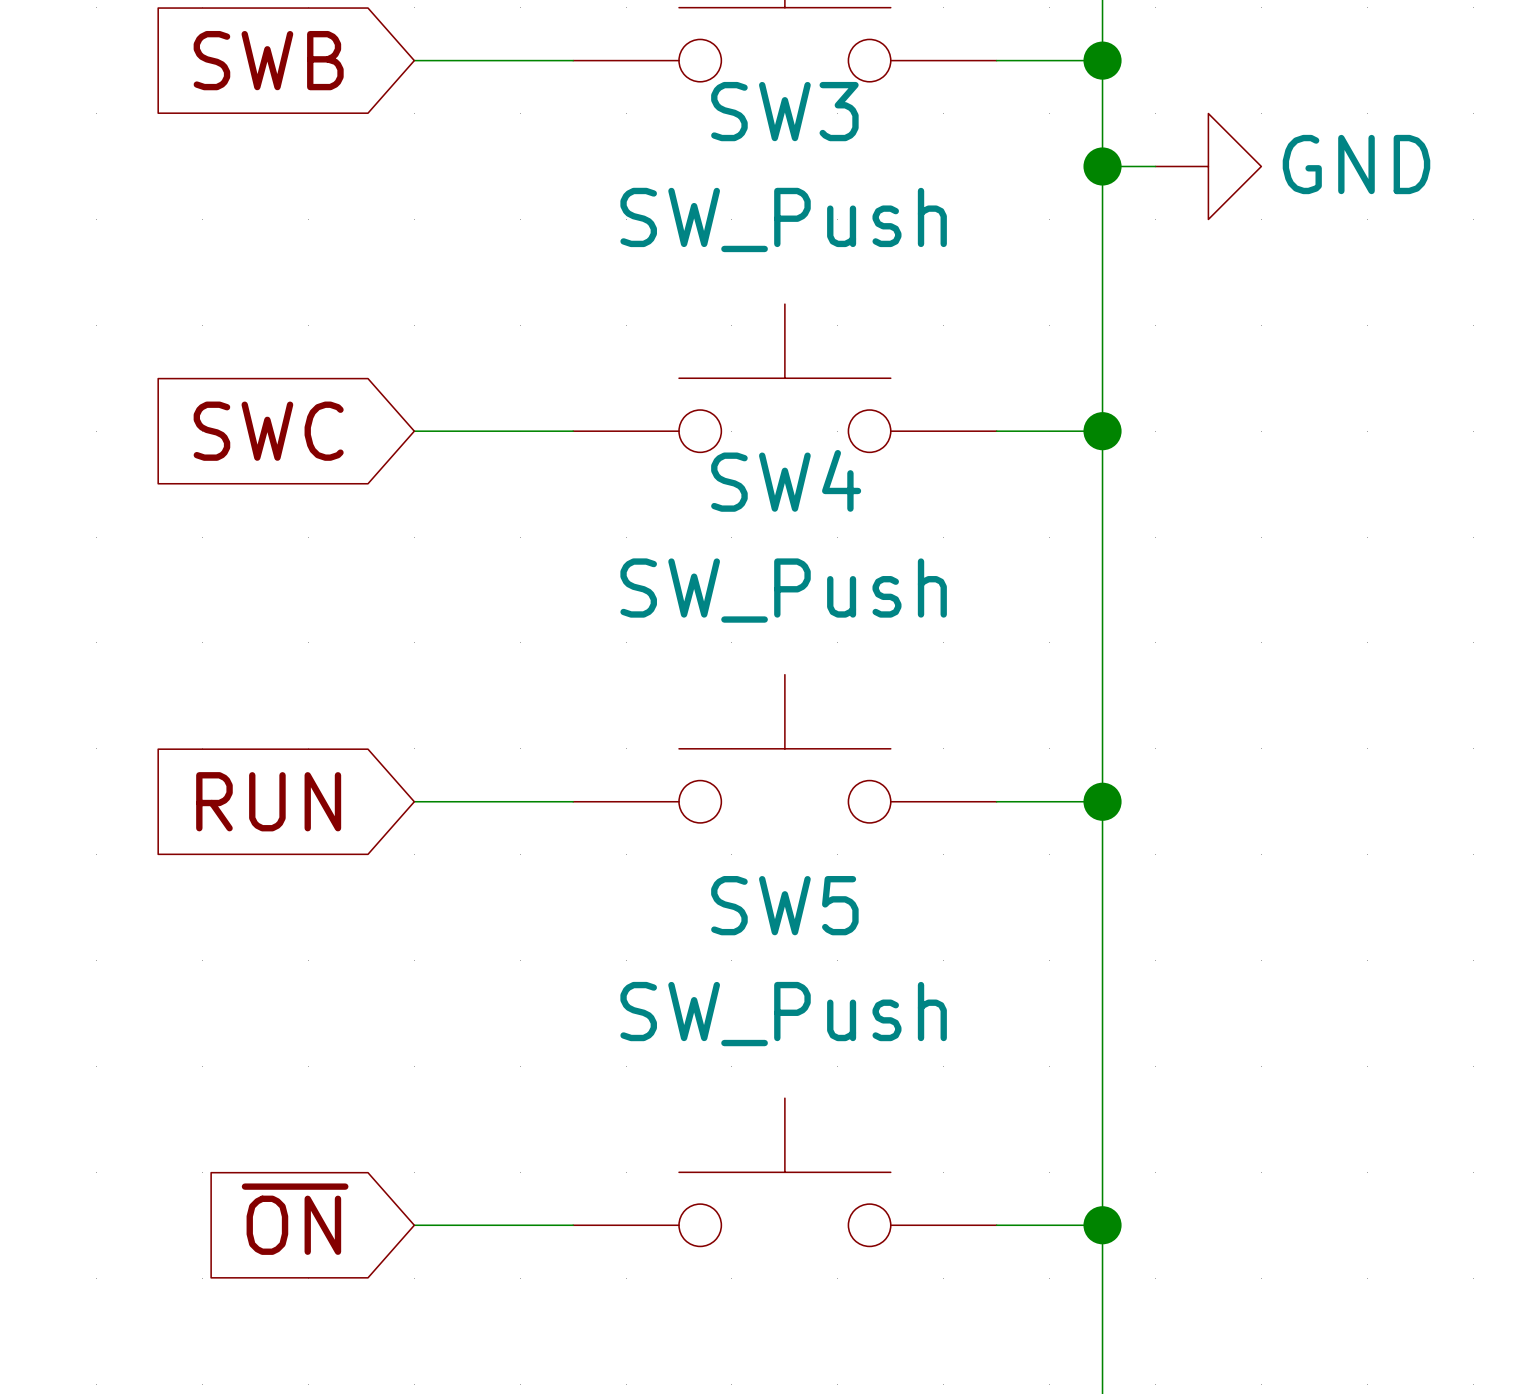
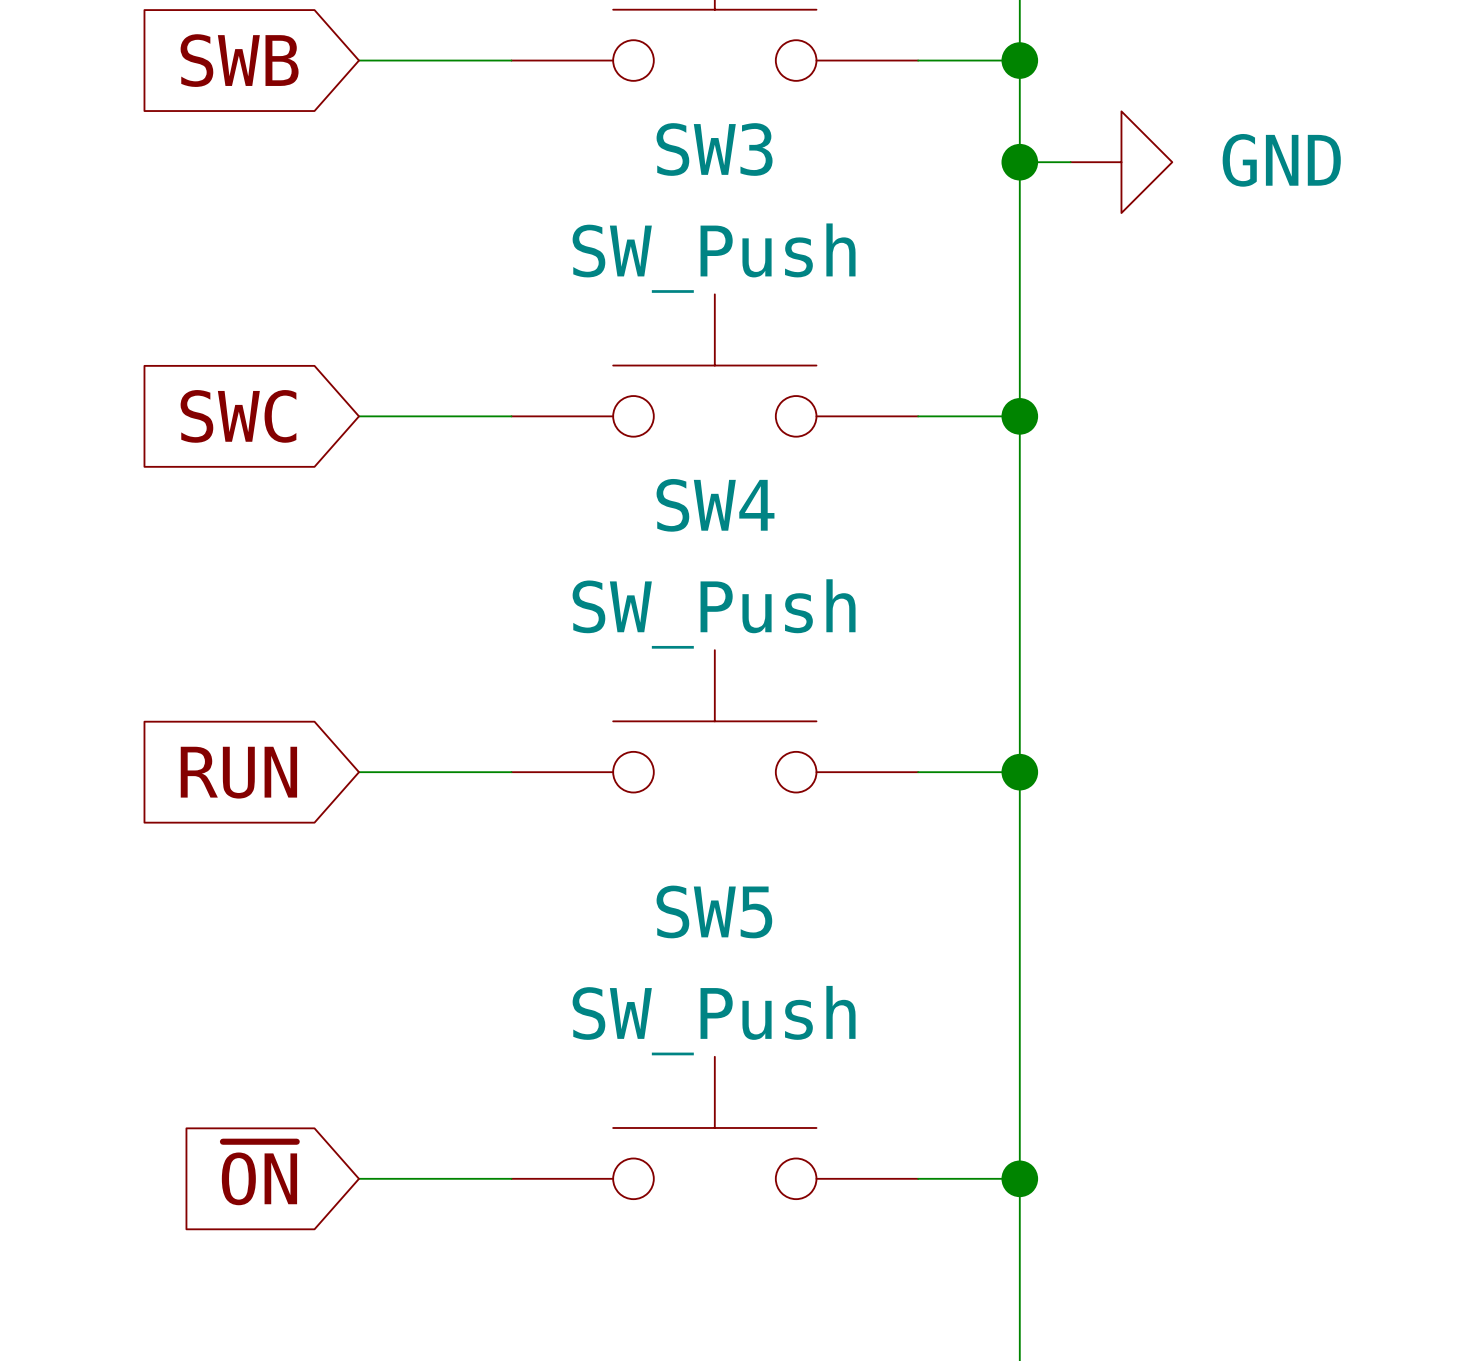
SW3 name position: SW3 (784, 111) -> SW3 (714, 149)
SW3 value position: SW_Push (783, 219) -> SW_Push (714, 258)
SW4 name position: SW4 (786, 480) -> SW4 (715, 505)
SW4 value position: SW_Push (783, 590) -> SW_Push (714, 613)
SW5 name position: SW5 (784, 905) -> SW5 (714, 911)
SW5 value position: SW_Push (783, 1014) -> SW_Push (714, 1020)

